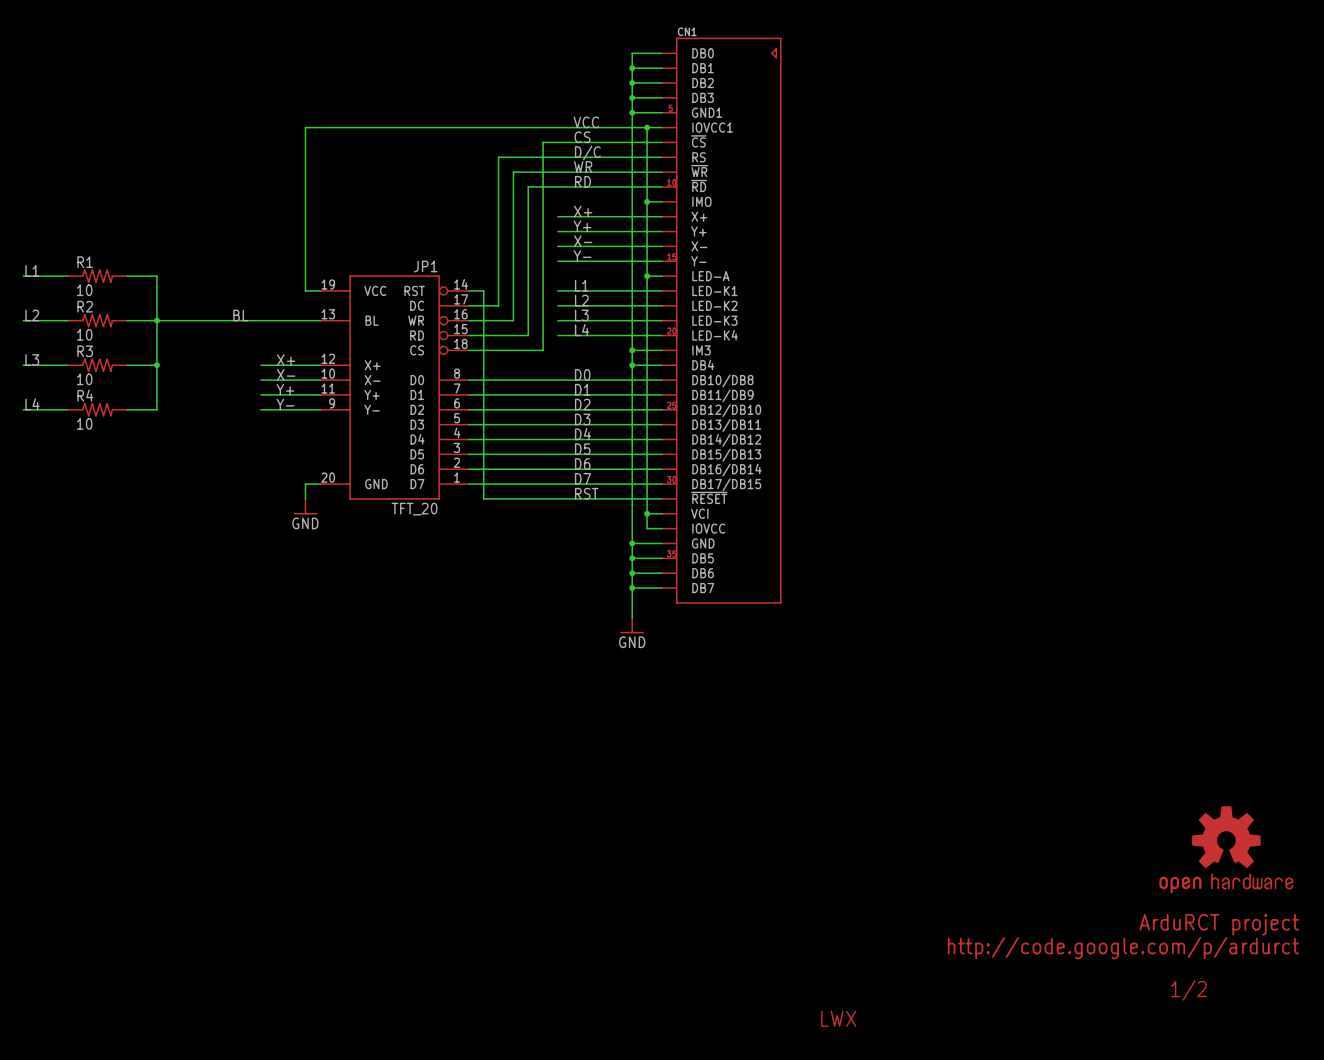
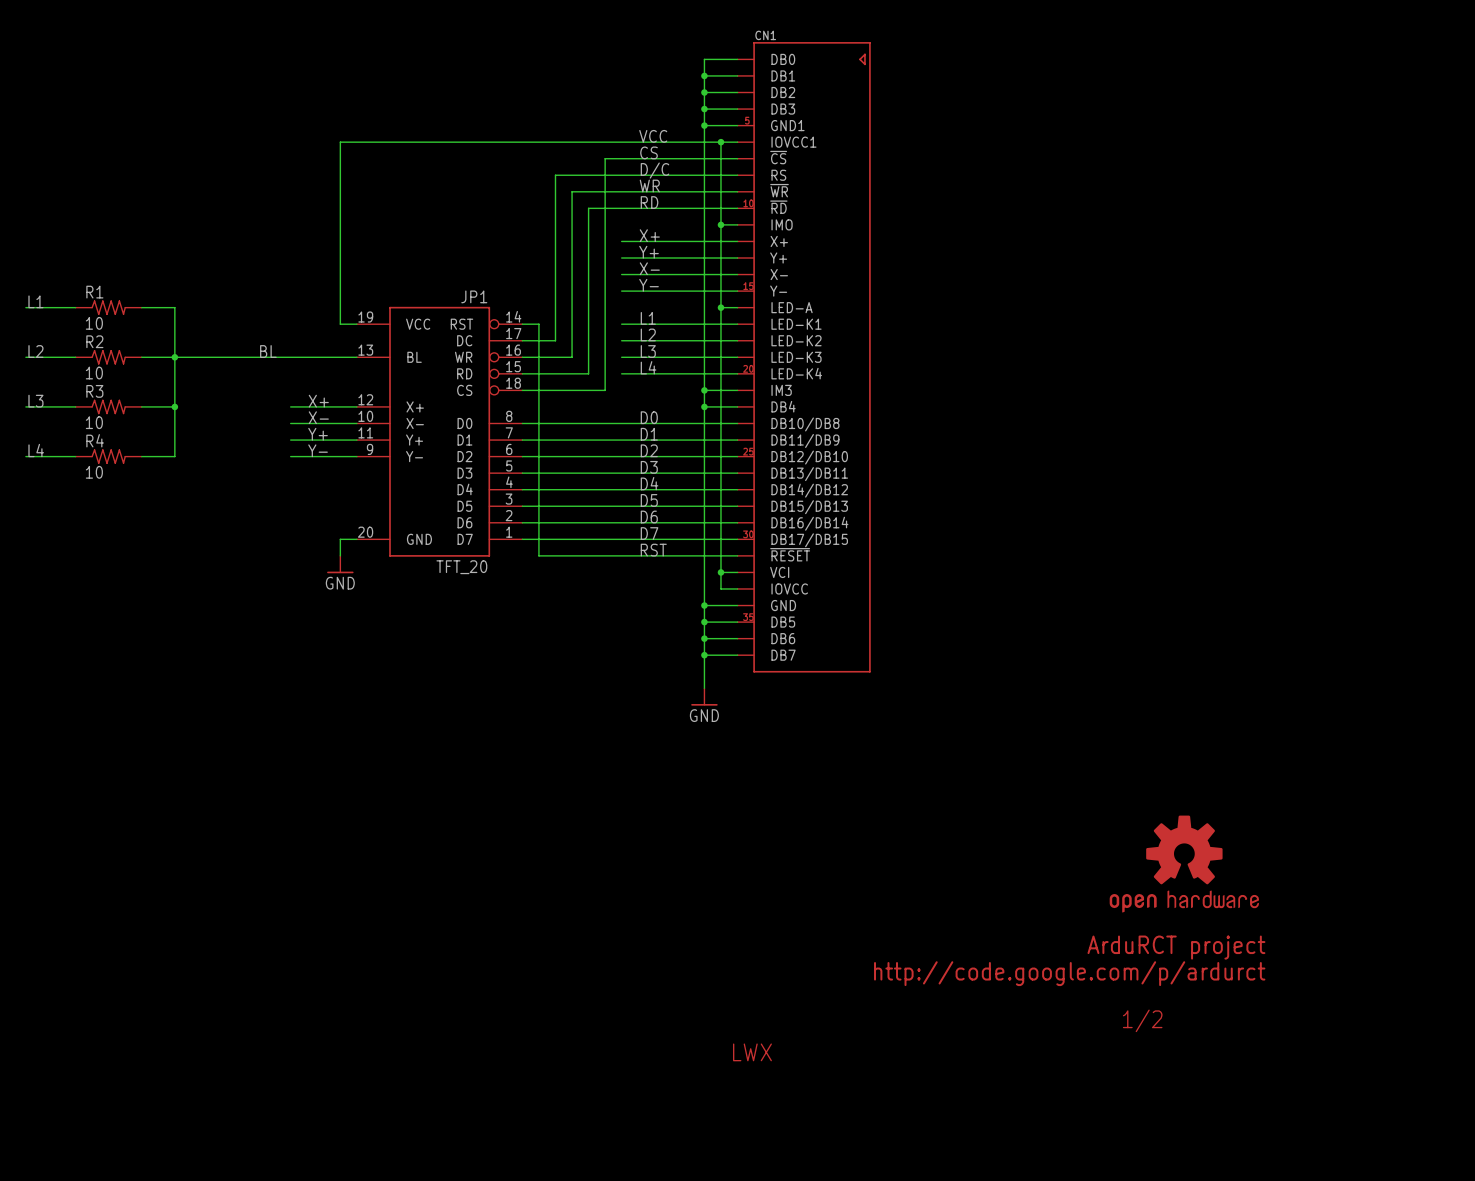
part: none -> (1184, 864)
part: (1226, 849) -> none
text: none -> ArduRCT project (1176, 947)
text: none -> http://code.google.com/p/ardurct (1069, 973)
text: none -> 1/2 (1142, 1020)
text: ArduRCT project (1219, 924) -> none
text: none -> LWX (752, 1052)
text: http://code.google.com/p/ardurct (1123, 948) -> none
text: 1/2 (1188, 990) -> none
text: LWX (838, 1018) -> none

